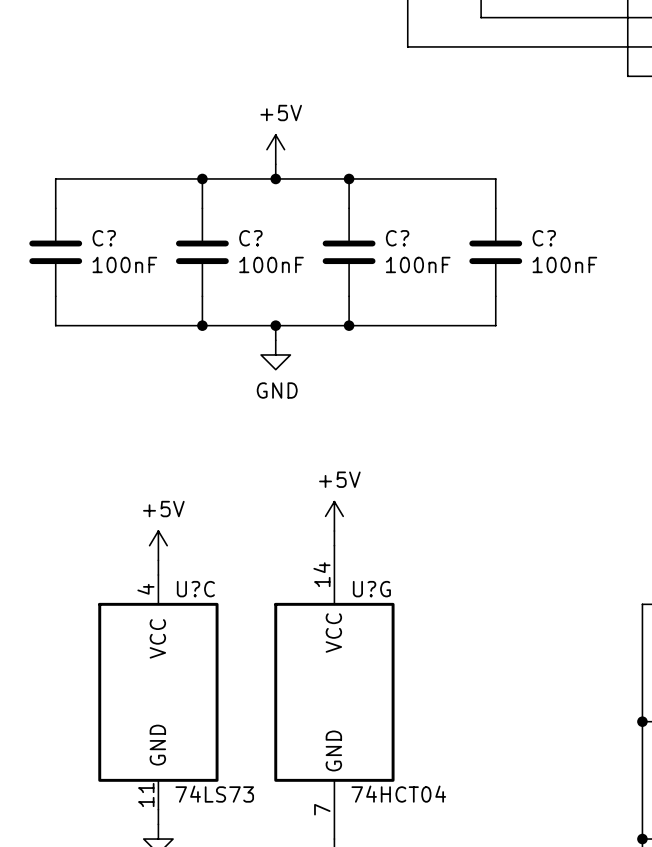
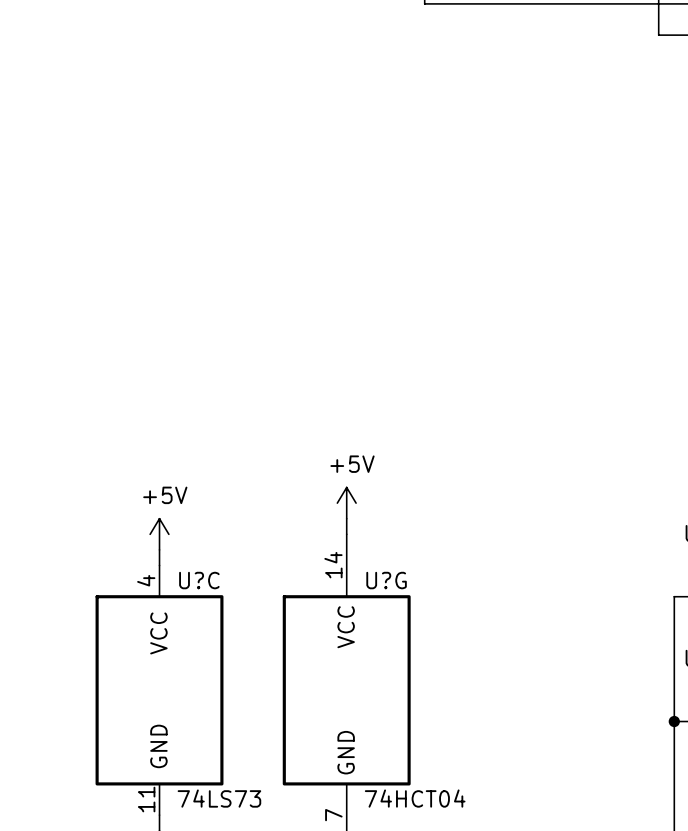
power symbol: +5V (275, 149) -> none
wire: (275, 164) (275, 178) -> none
wire: (202, 178) (202, 208) -> none
junction: (202, 178) -> none
junction: (275, 178) -> none
wire: (349, 178) (349, 208) -> none
junction: (349, 178) -> none
wire: (55, 208) (55, 178) (495, 178) (495, 208) -> none
C?: 100nF (55, 252) -> none
C?: 100nF (202, 252) -> none
C?: 100nF (349, 252) -> none
C?: 100nF (495, 252) -> none
wire: (55, 296) (55, 325) (495, 325) (495, 296) -> none
wire: (202, 296) (202, 325) -> none
wire: (349, 296) (349, 325) -> none
junction: (202, 325) -> none
wire: (275, 325) (275, 340) -> none
junction: (275, 325) -> none
junction: (349, 325) -> none
power symbol: GND (275, 354) -> none

